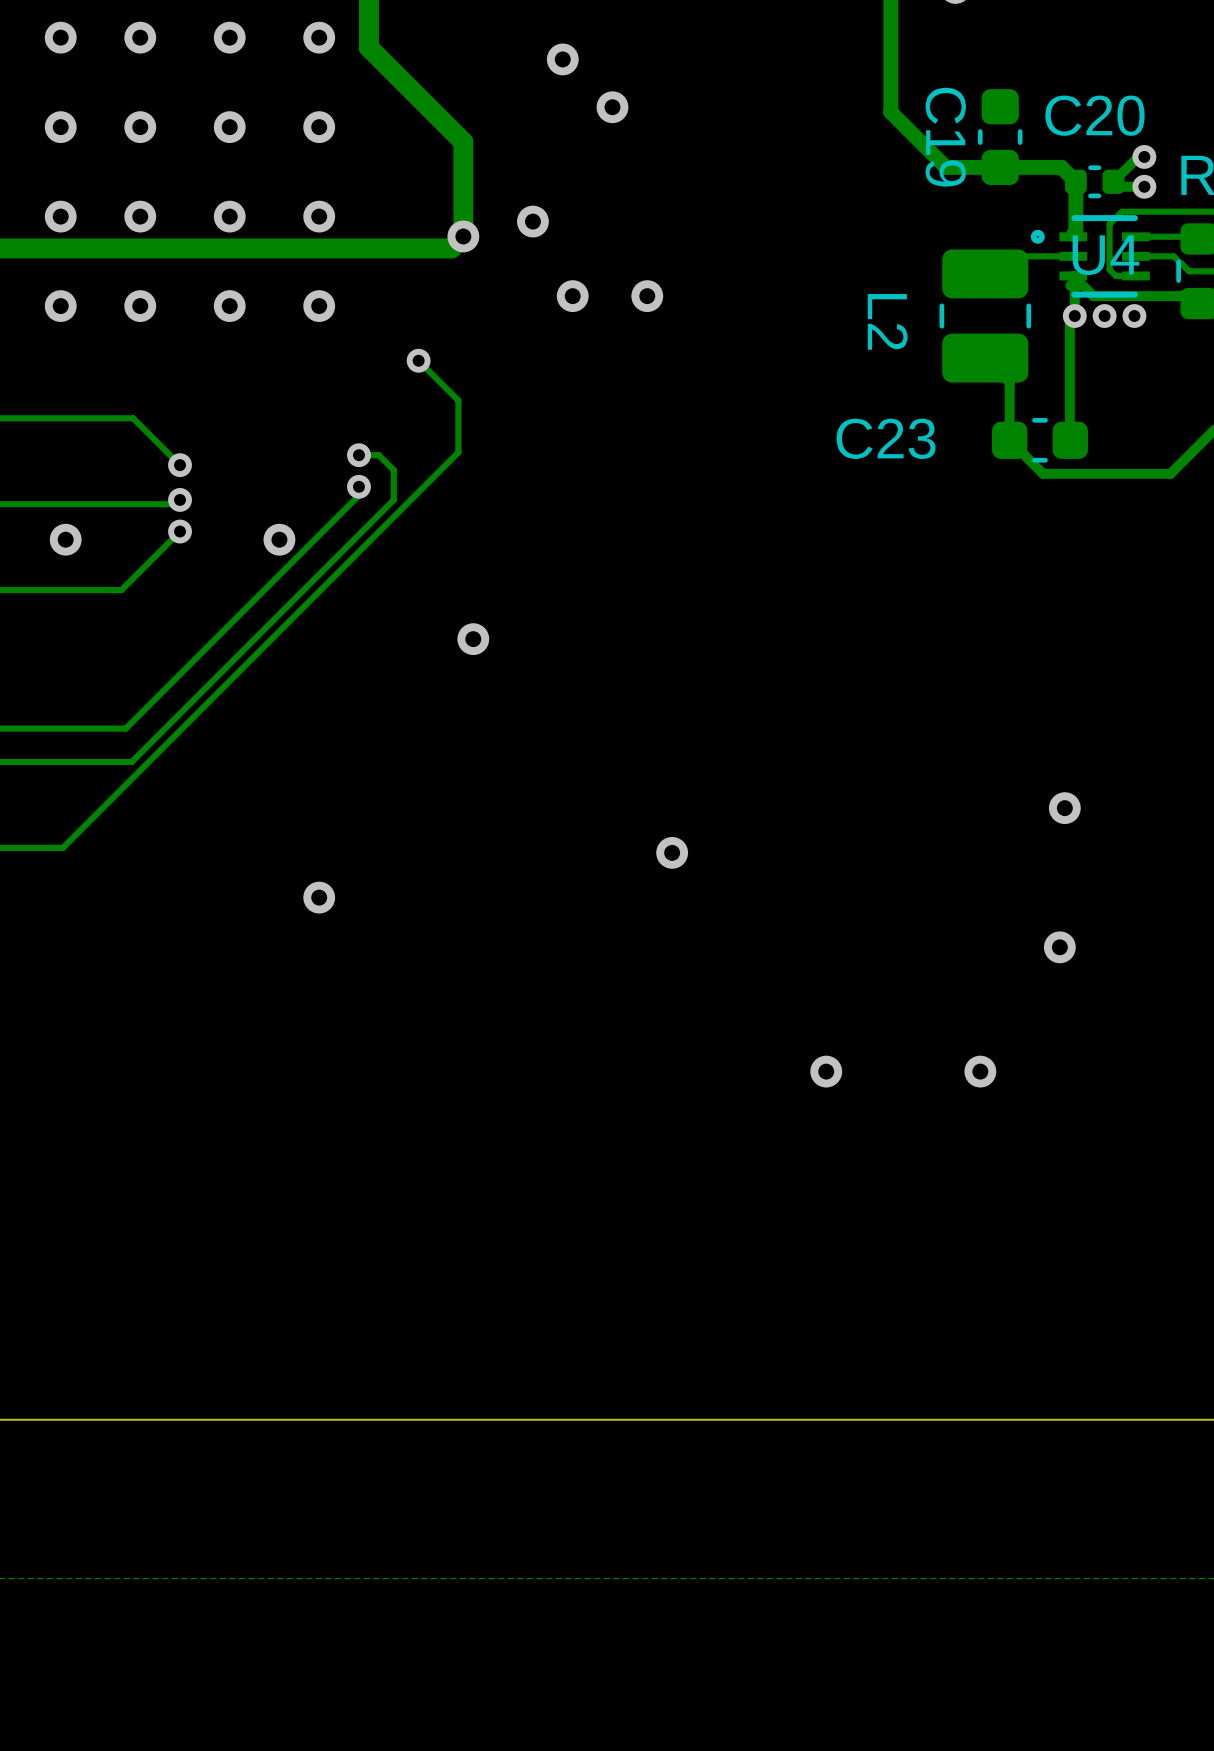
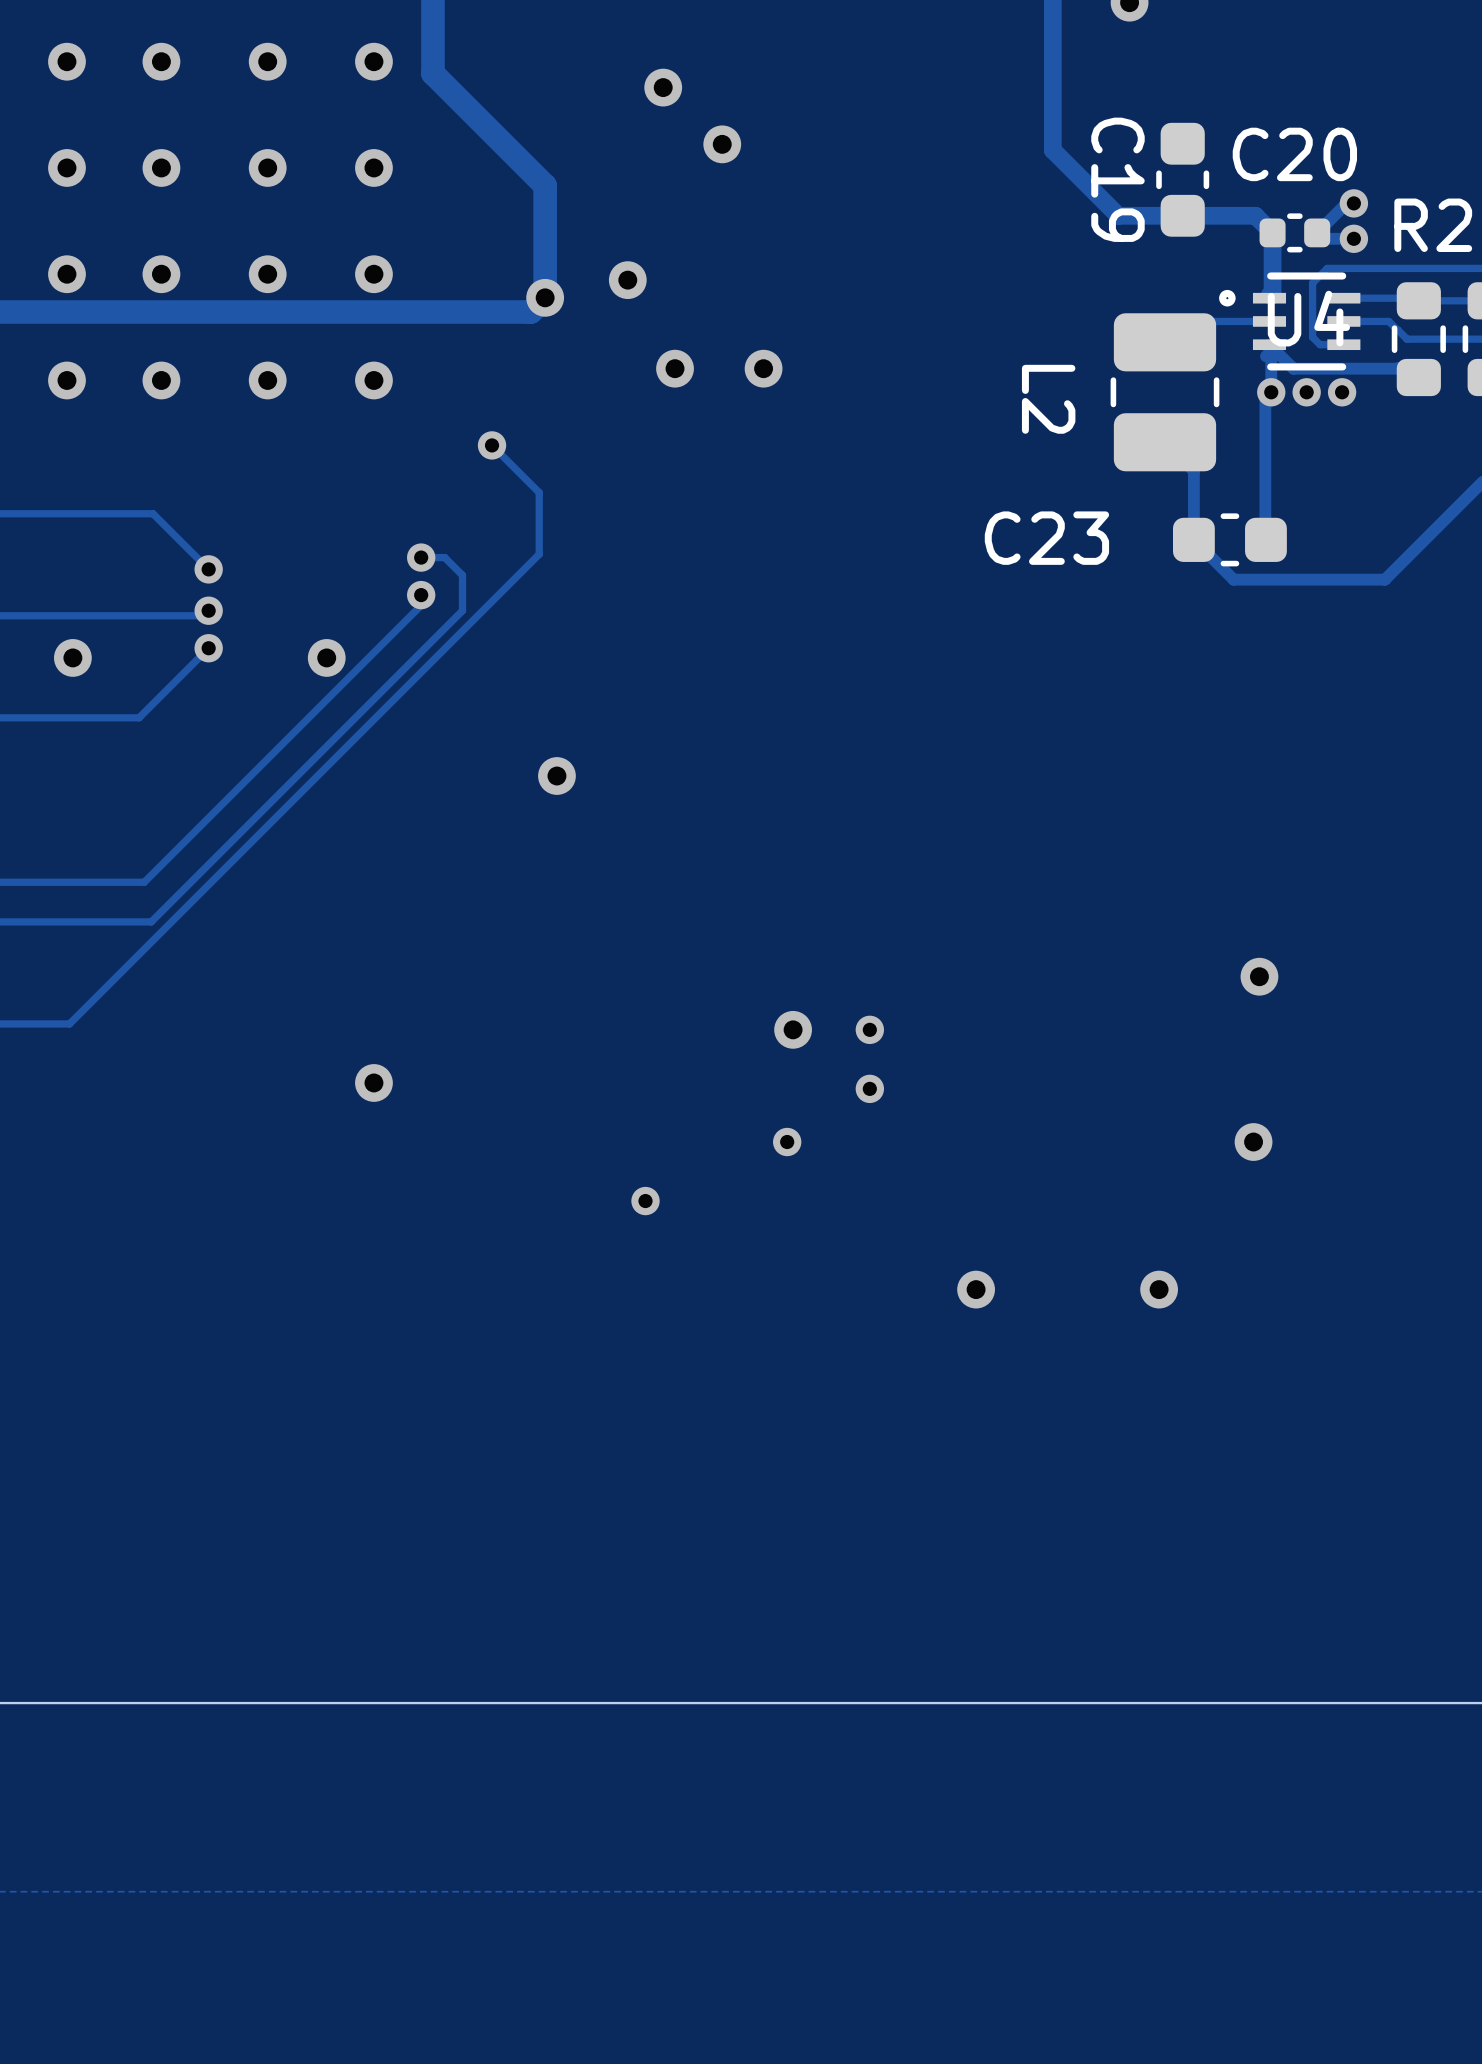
via: none -> (869, 1029)
via: none -> (869, 1088)
via: none -> (787, 1142)
via: none -> (645, 1201)

